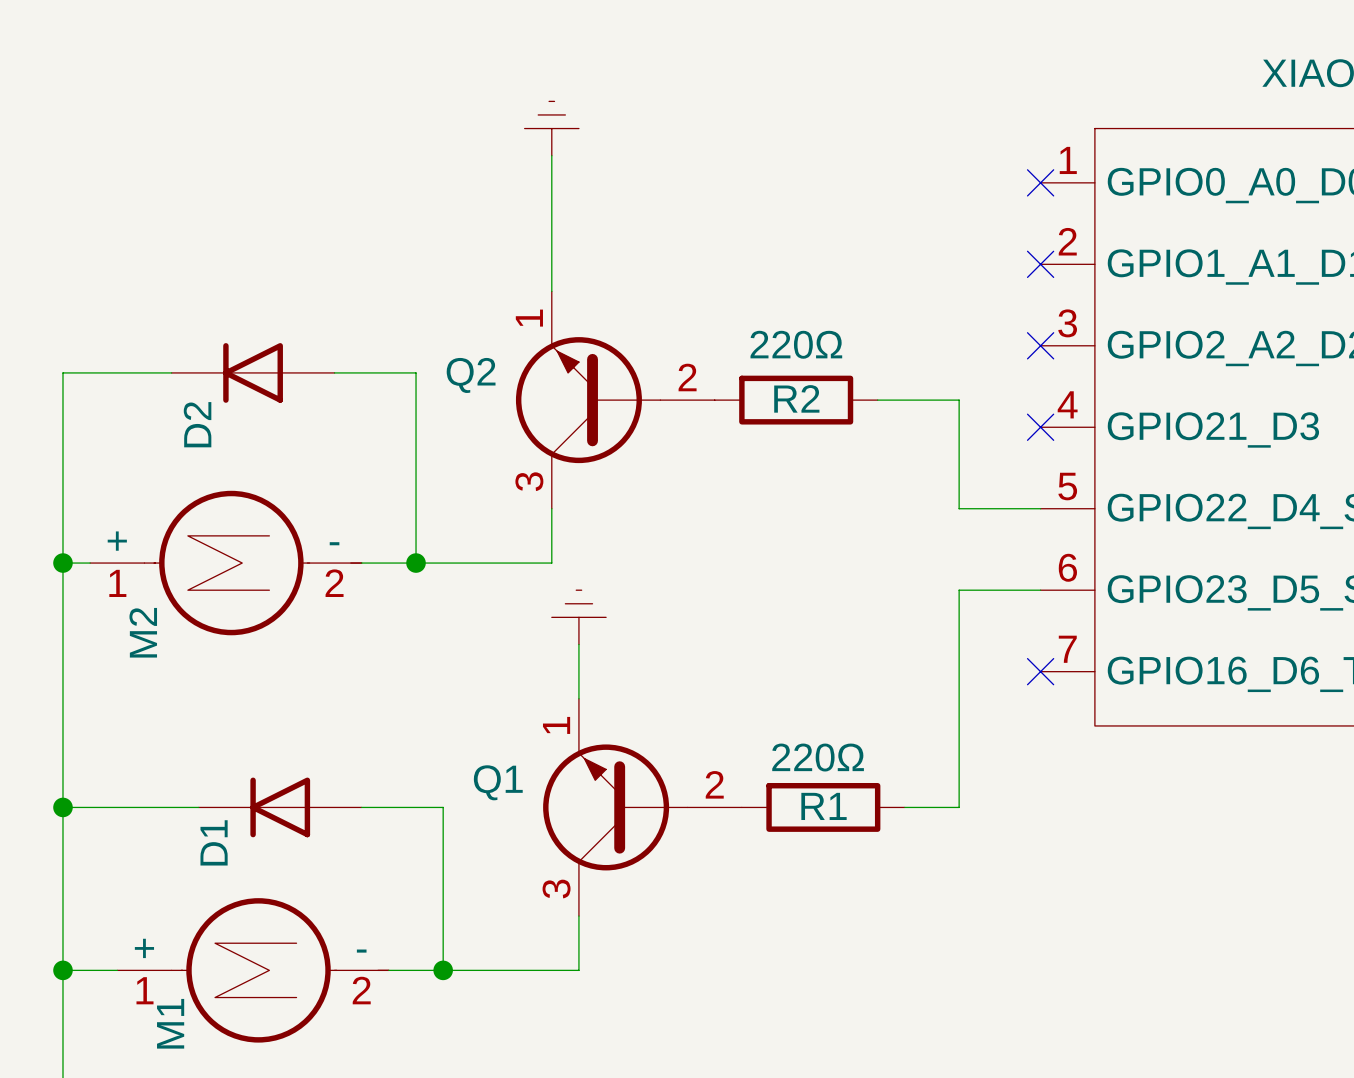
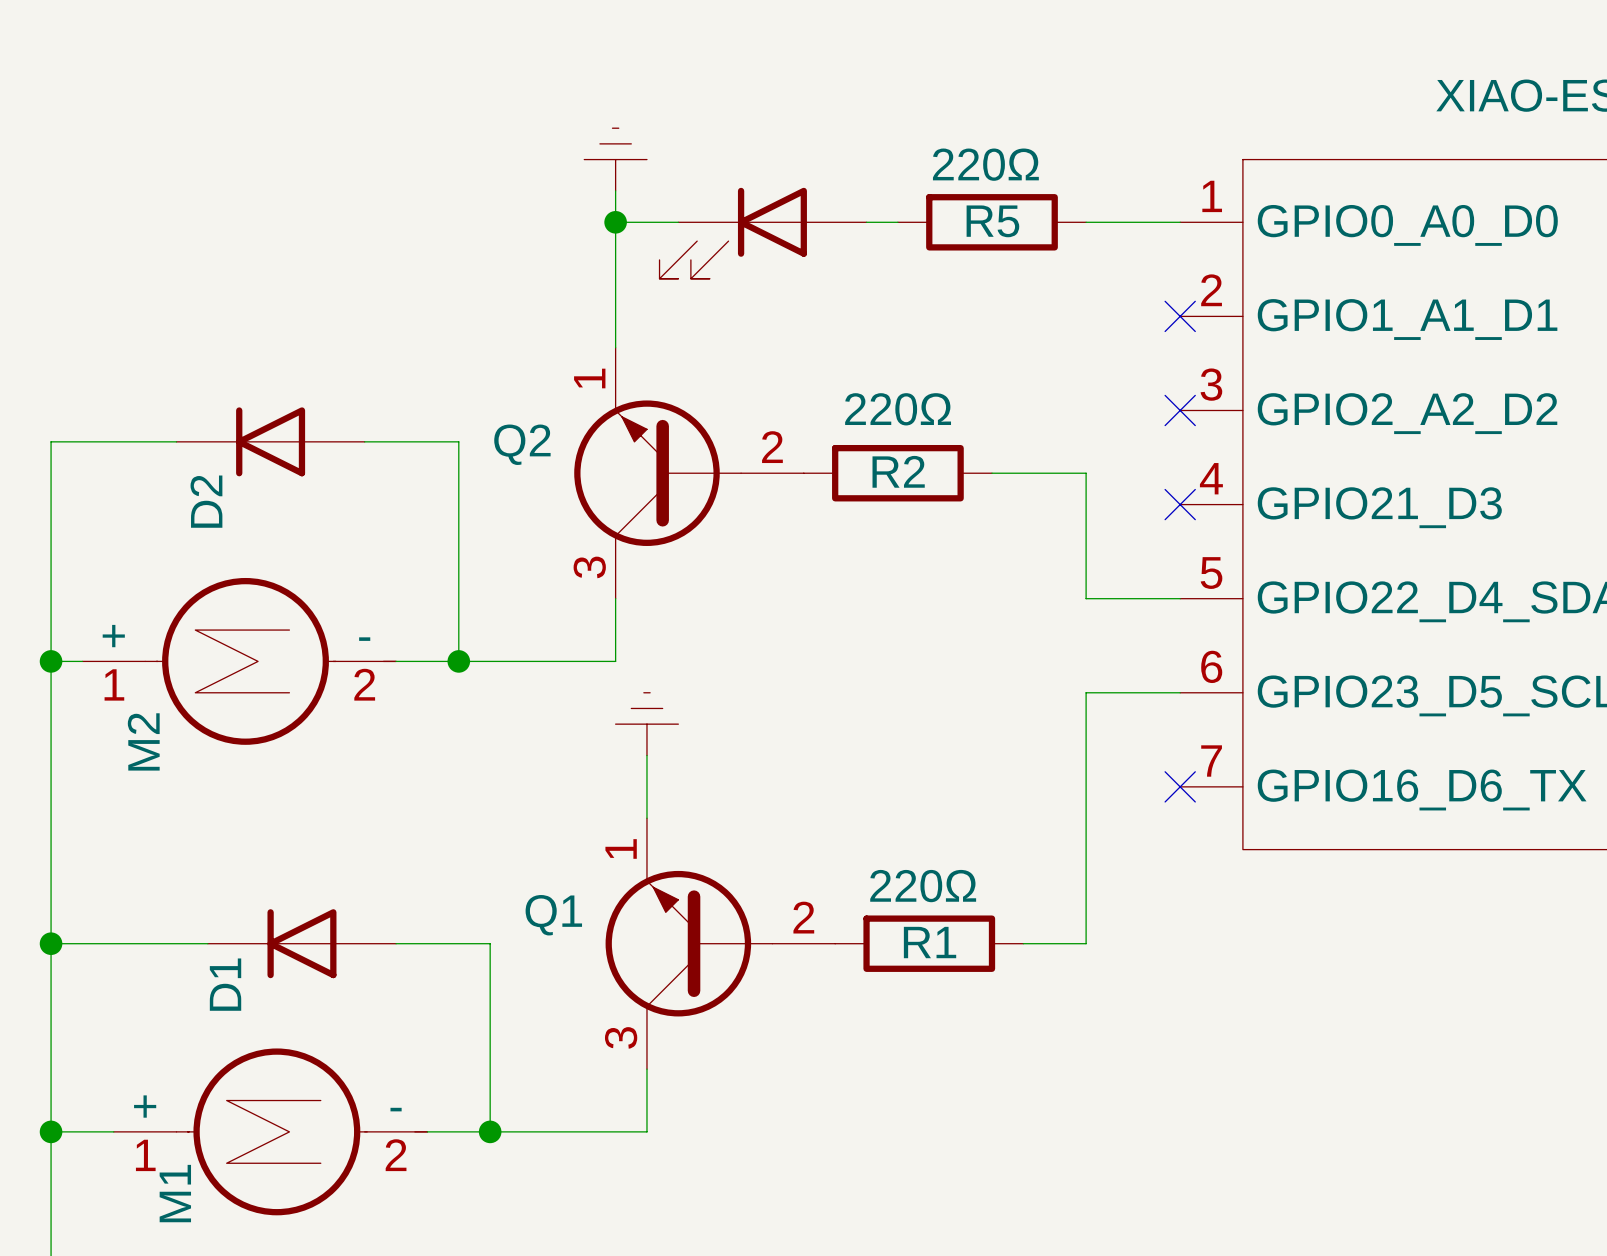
wire: none -> (615, 222) (678, 222)
junction: none -> (615, 222)
wire: none -> (866, 222) (897, 222)
R5: none -> 220Ω (992, 222)
wire: none -> (1086, 222) (1180, 222)
no-connect mark: (1040, 182) -> none
part: none -> (763, 233)

